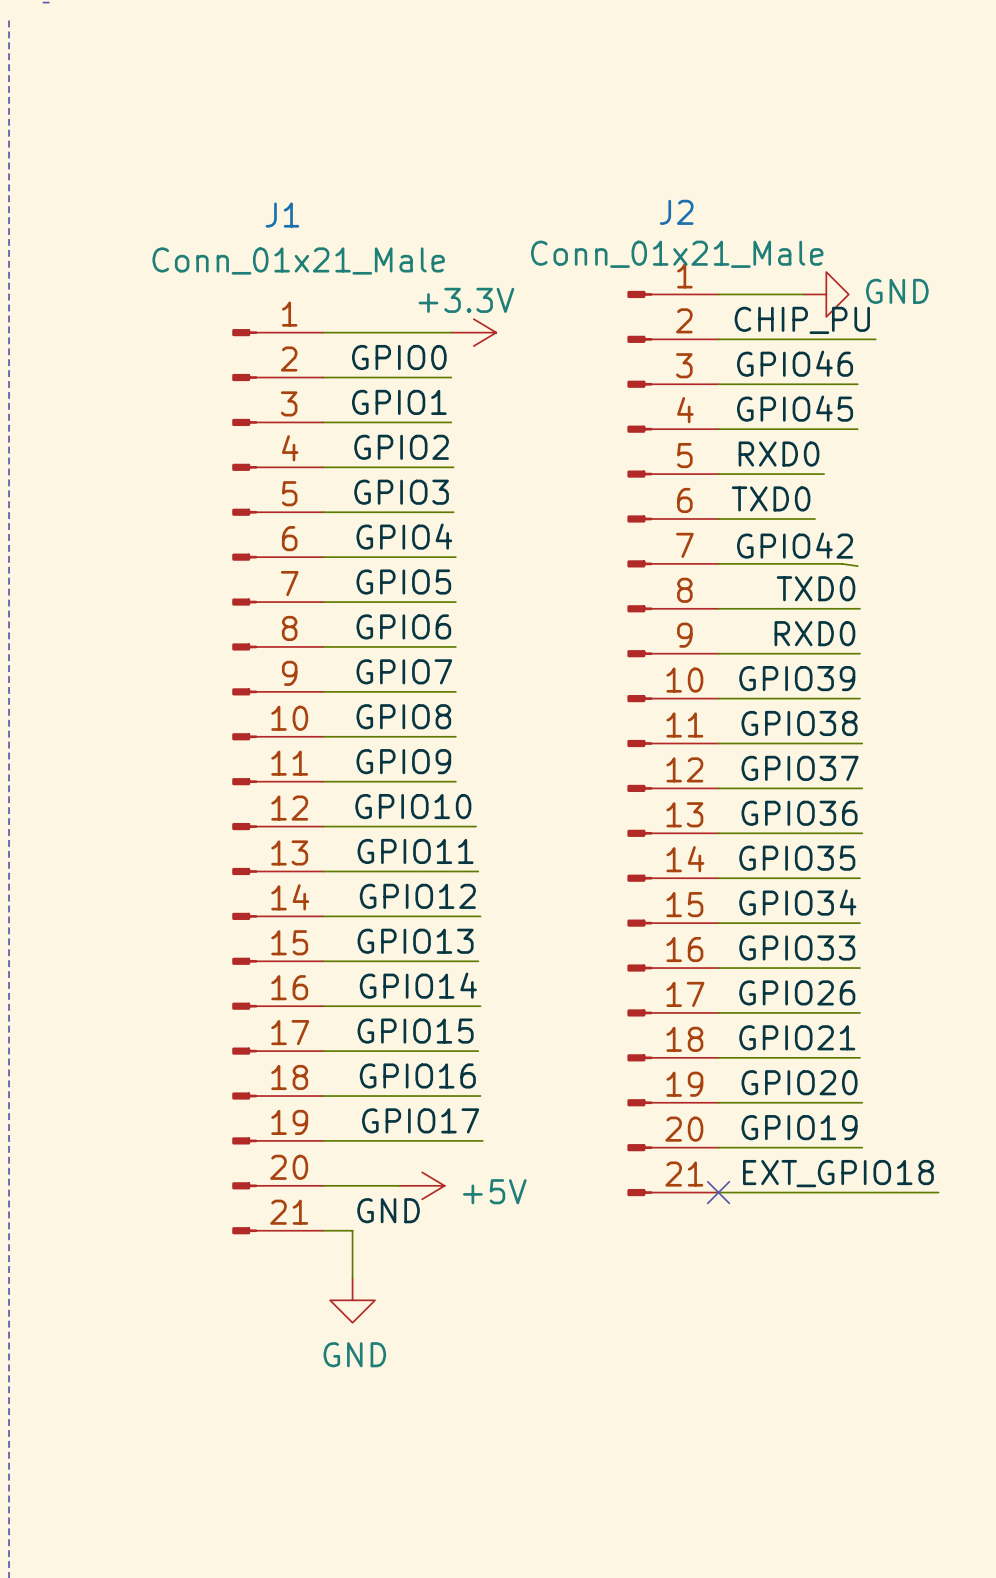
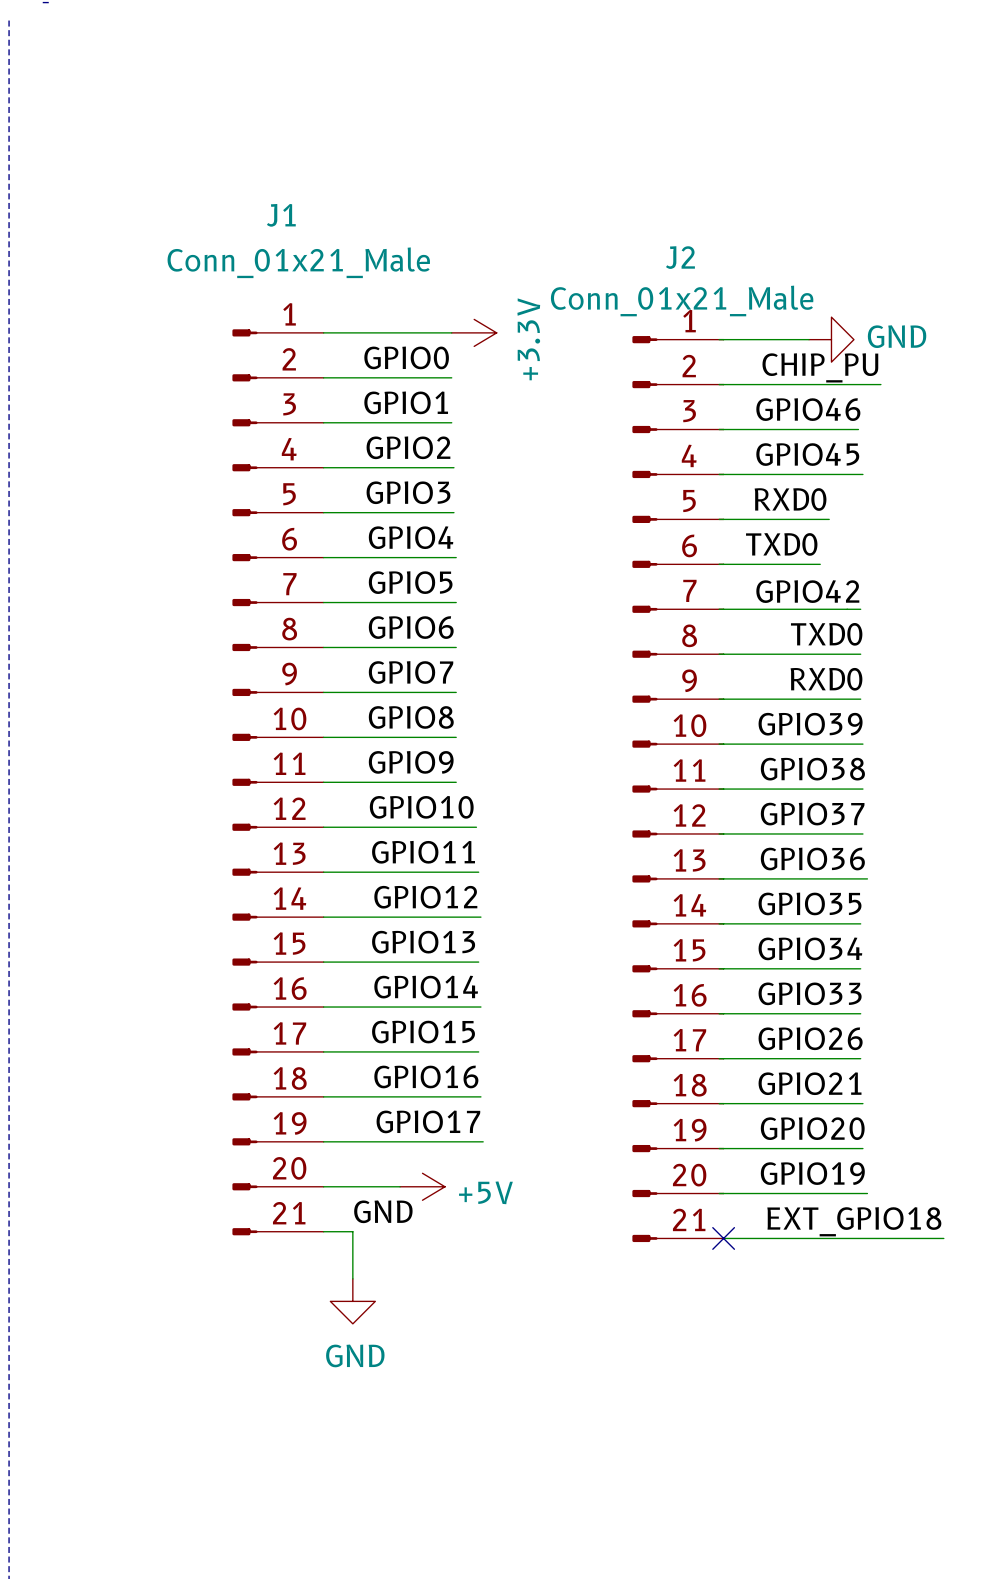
wire: (718, 294) (803, 294) -> none
power symbol position: GND (826, 294) -> GND (831, 339)
power symbol text rotation: 0° (466, 300) -> 90° counterclockwise (528, 339)
label position: CHIP_PU (802, 320) -> CHIP_PU (820, 367)
wire: (808, 339) (875, 339) -> none
label position: GPIO46 (795, 363) -> GPIO46 (808, 409)
wire: none -> (858, 384) (880, 384)
label position: GPIO45 (795, 408) -> GPIO45 (807, 454)
label position: RXD0 (778, 454) -> RXD0 (790, 499)
wire: none -> (824, 474) (862, 474)
label: TXD0 (771, 498) -> none
wire: none -> (815, 519) (829, 519)
label: none -> TXD0 (781, 544)
label position: GPIO42 (795, 545) -> GPIO42 (807, 591)
wire: (819, 563) (857, 566) -> none
label: TXD0 (815, 588) -> none
label position: RXD0 (814, 633) -> RXD0 (826, 679)
label: none -> TXD0 (826, 634)
label position: GPIO39 (797, 678) -> GPIO39 (810, 724)
label position: GPIO38 (799, 723) -> GPIO38 (812, 769)
J2 position: (672, 743) -> (678, 789)
label position: GPIO37 (800, 768) -> GPIO37 (812, 814)
label position: GPIO36 (799, 813) -> GPIO36 (812, 859)
label position: GPIO35 (797, 858) -> GPIO35 (810, 903)
wire: none -> (860, 878) (867, 878)
label position: GPIO34 (797, 902) -> GPIO34 (810, 948)
label position: GPIO33 (797, 948) -> GPIO33 (810, 993)
label position: GPIO26 (797, 992) -> GPIO26 (810, 1038)
label position: GPIO21 (797, 1037) -> GPIO21 (810, 1083)
label position: GPIO20 (799, 1082) -> GPIO20 (812, 1128)
label position: GPIO19 (799, 1127) -> GPIO19 (812, 1173)
label position: EXT_GPIO18 (838, 1173) -> EXT_GPIO18 (854, 1221)
no-connect mark position: (718, 1192) -> (723, 1238)
wire: (866, 1192) (938, 1192) -> none
wire: none -> (723, 1238) (943, 1238)

